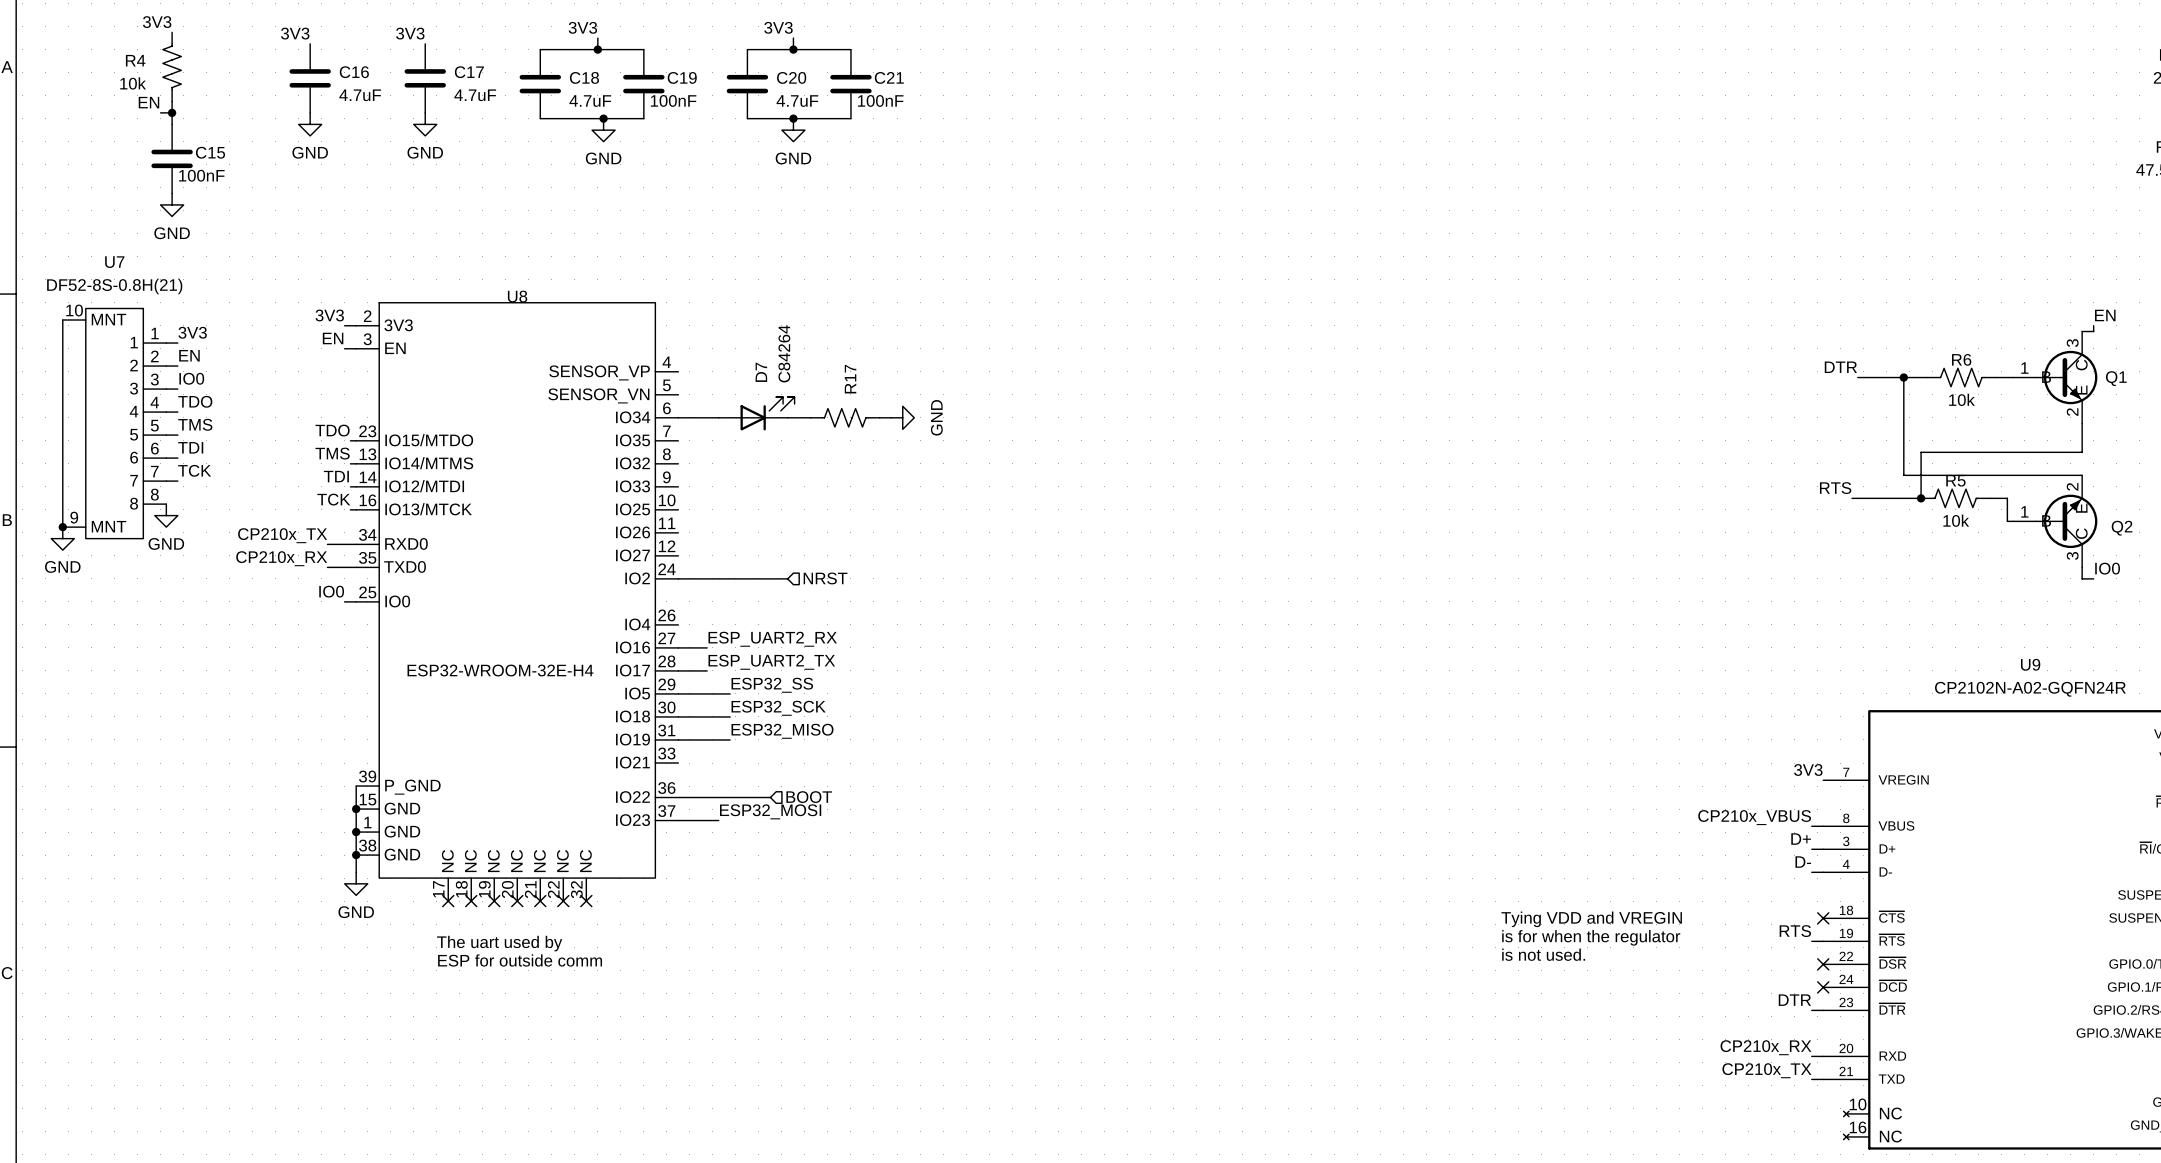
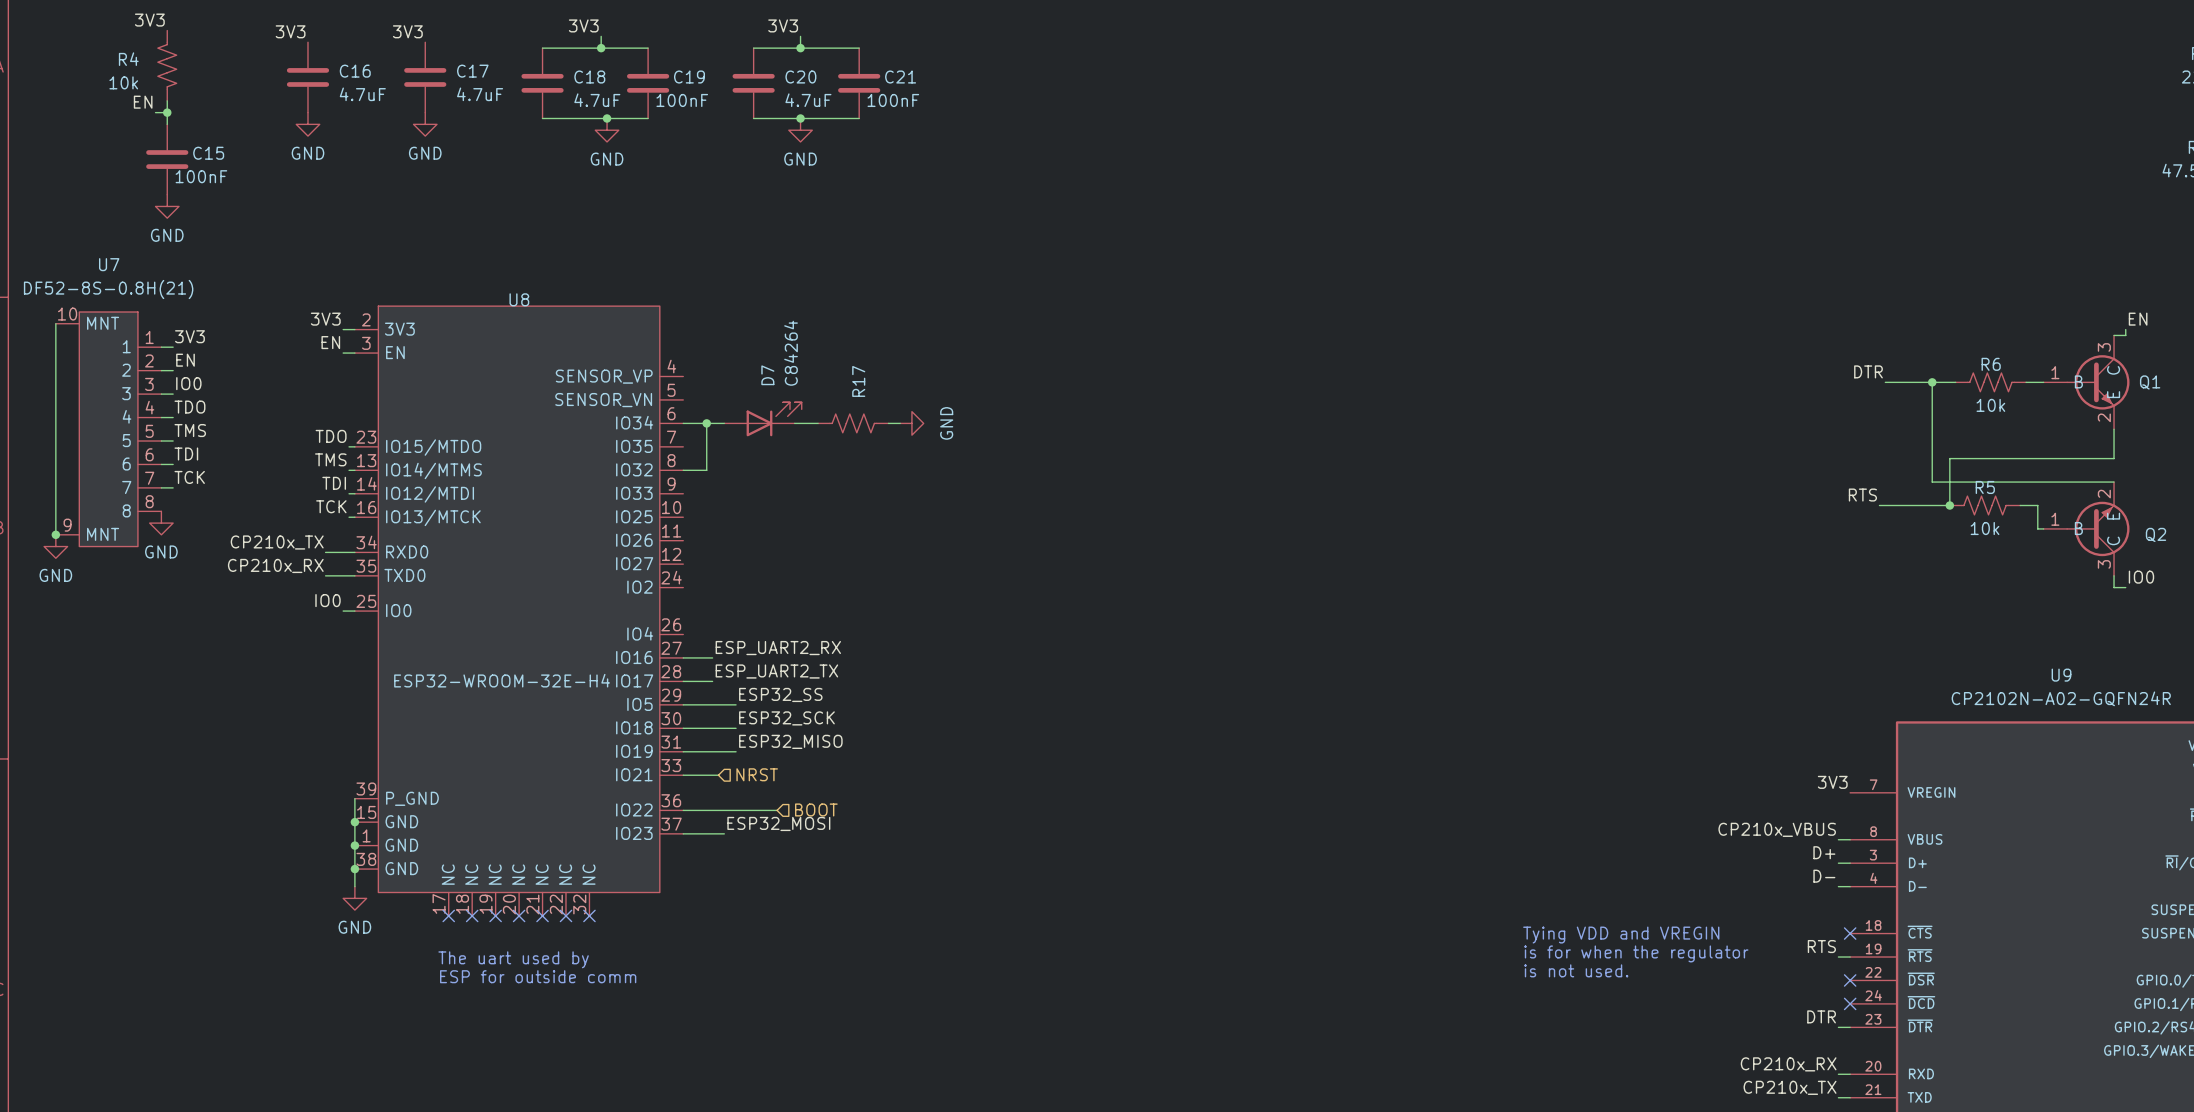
wire: none -> (706, 423) (706, 470) (683, 470)
junction: none -> (706, 423)
wire: (678, 578) (787, 578) -> none
hierarchical label position: NRST (825, 578) -> NRST (757, 774)
wire: none -> (683, 775) (718, 775)

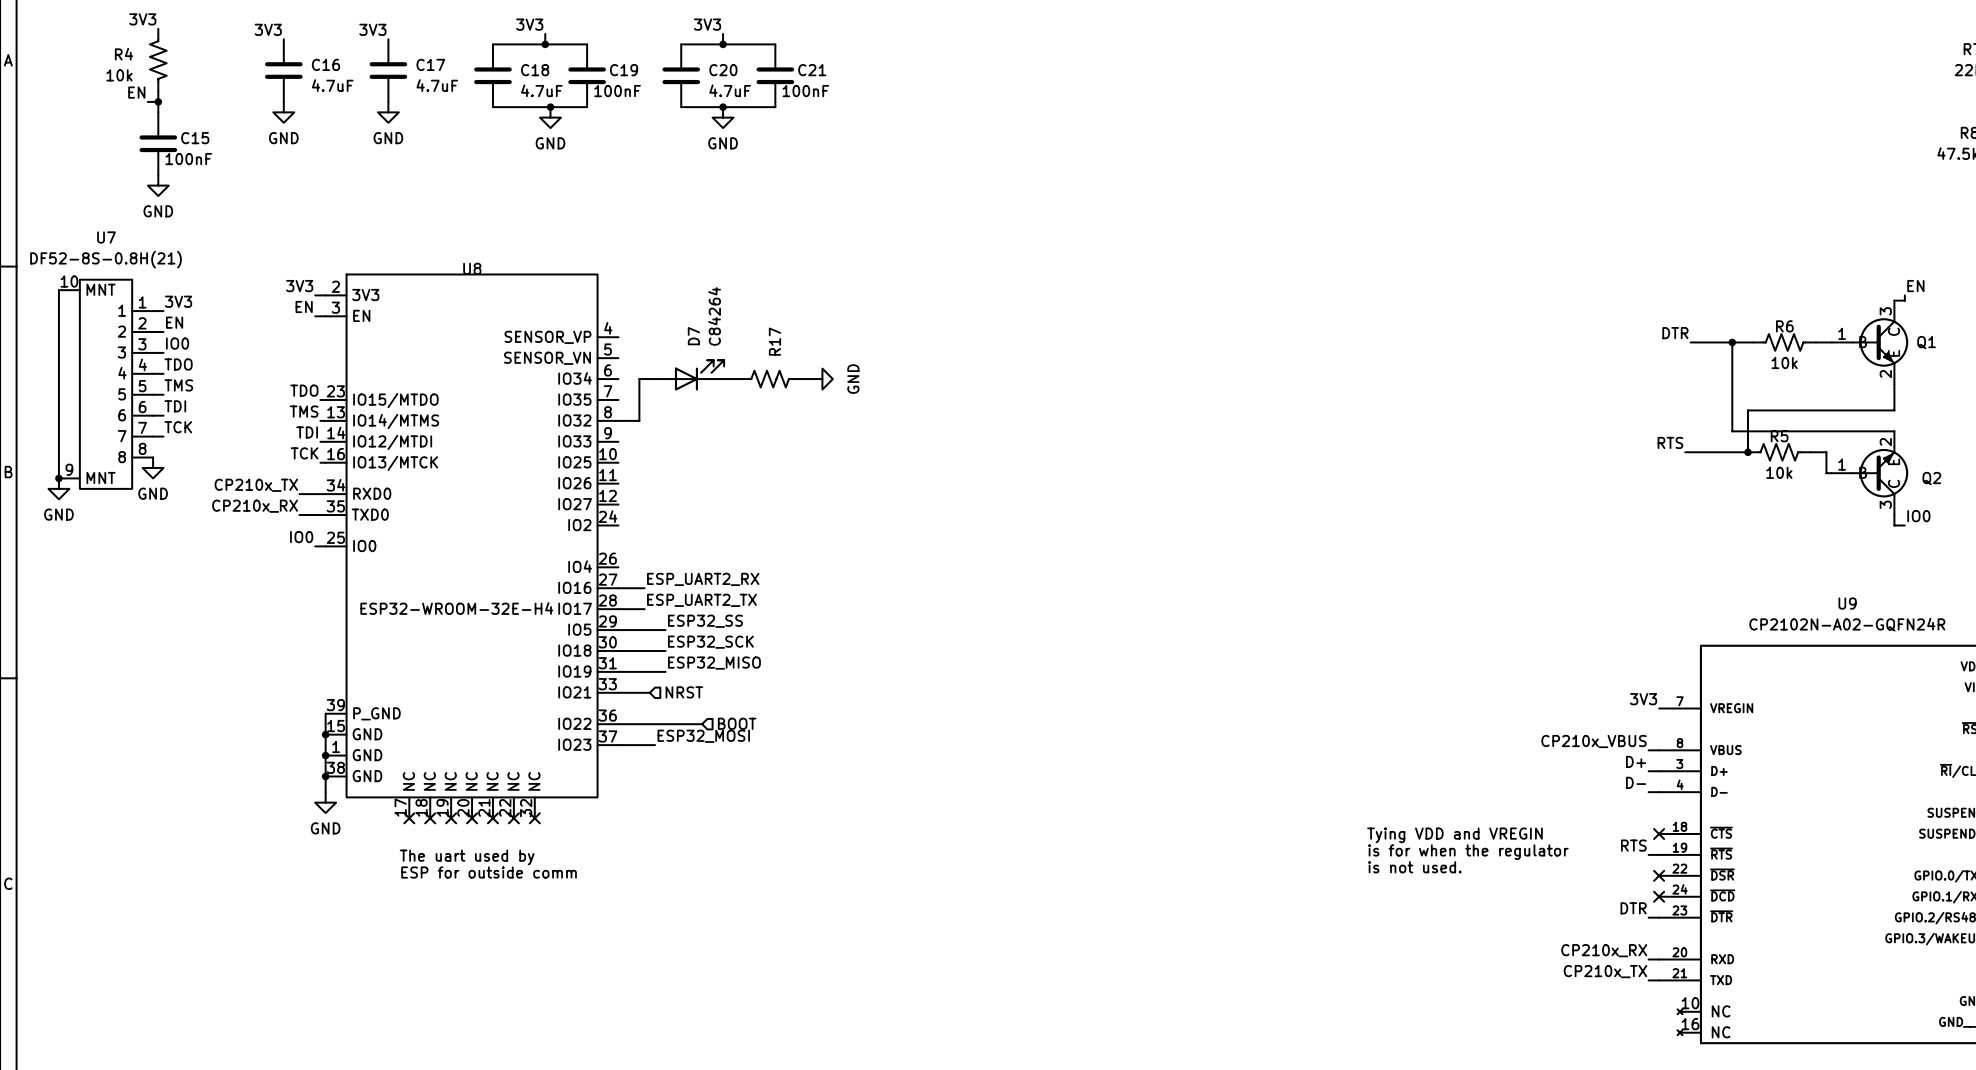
wire: (683, 423) (706, 423) -> none
junction: (706, 423) -> none

